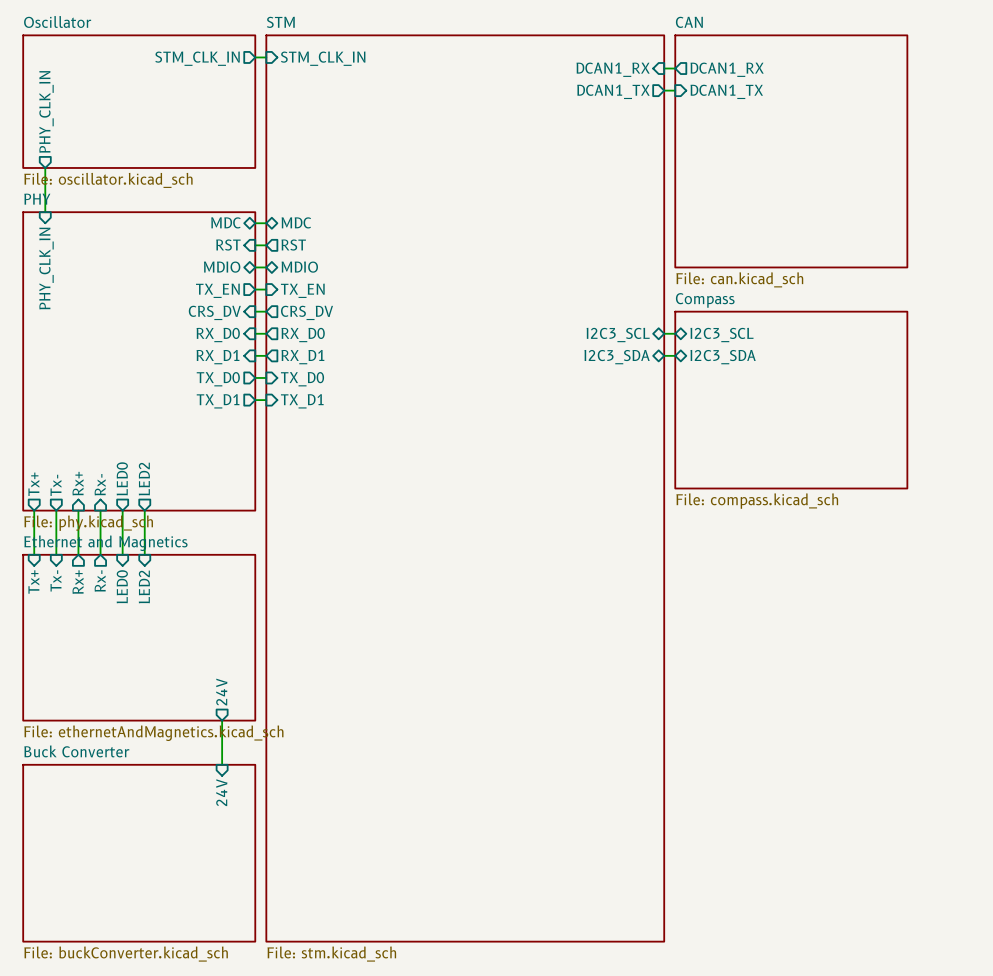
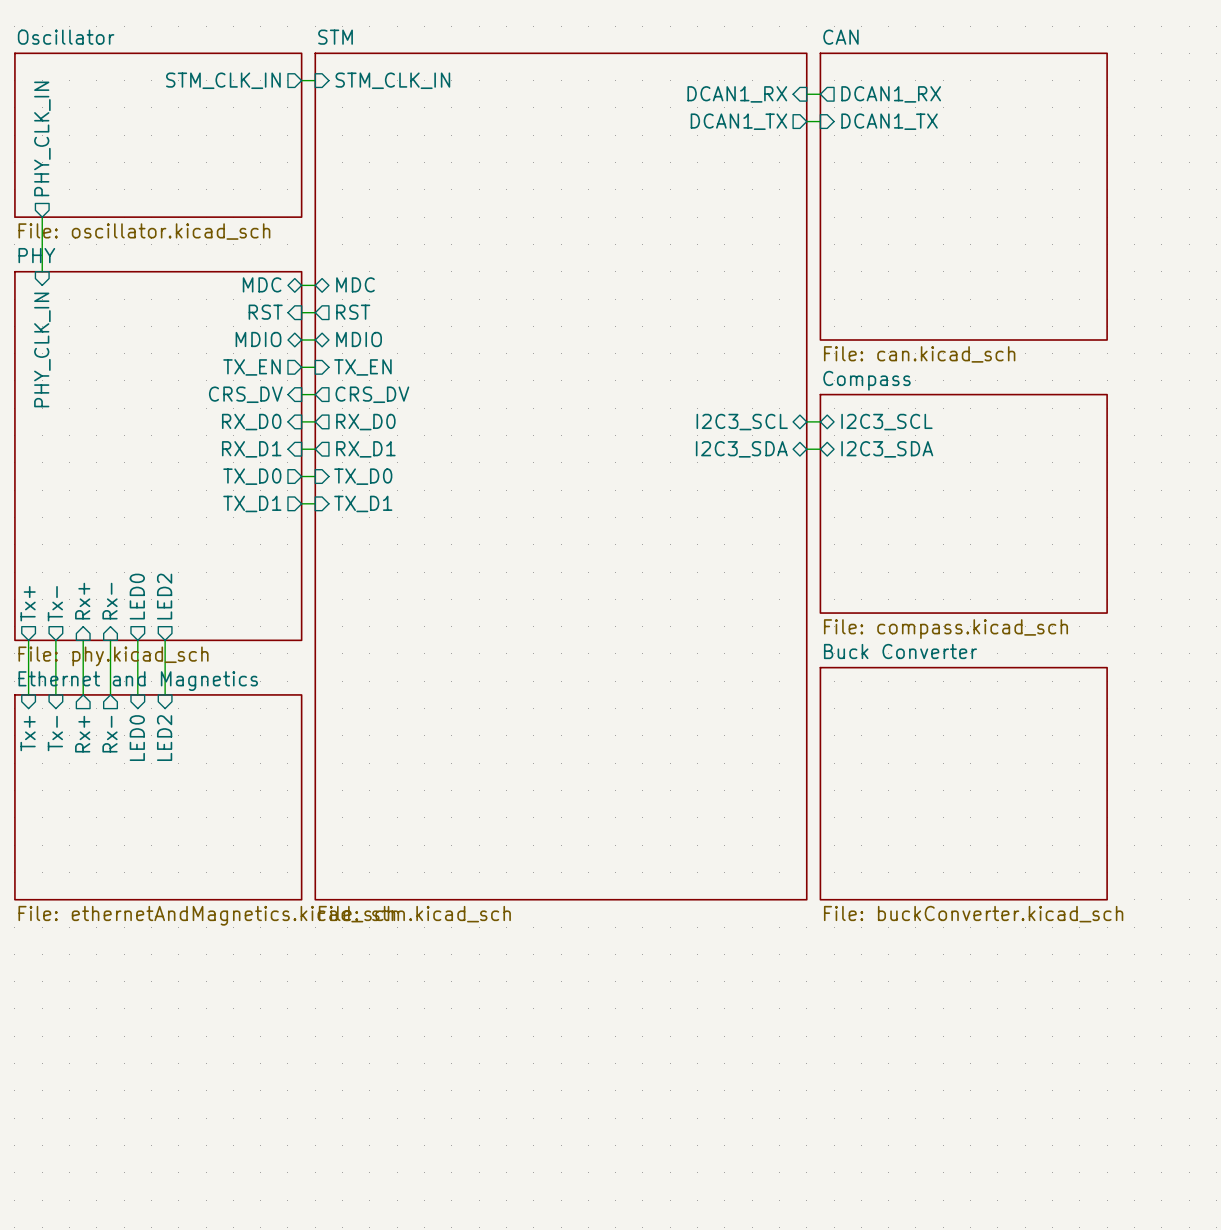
sheet STM: none -> File: stm.kicad_sch (561, 476)
sheet STM: File: stm.kicad_sch (465, 488) -> none
sheet Buck Converter: none -> File: buckConverter.kicad_sch (963, 783)
sheet pin: 24V (221, 692) -> none
wire: (222, 720) (222, 764) -> none
sheet pin: 24V (221, 792) -> none
sheet Buck Converter: File: buckConverter.kicad_sch (139, 853) -> none

